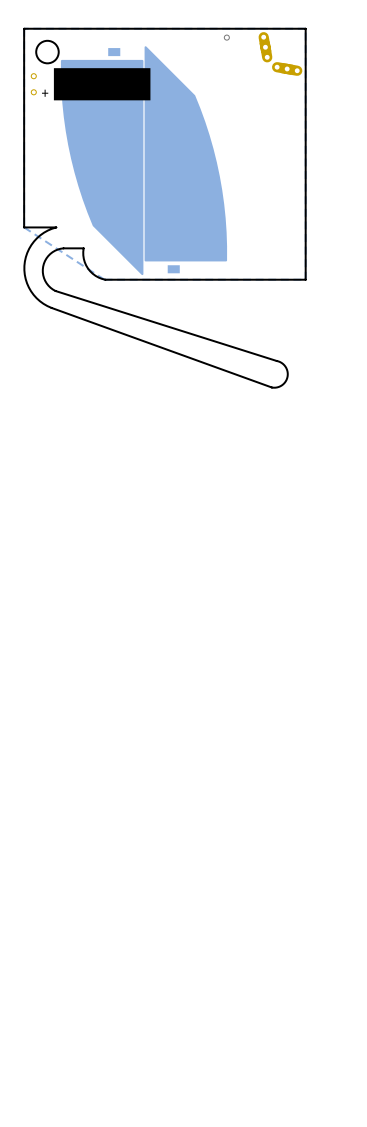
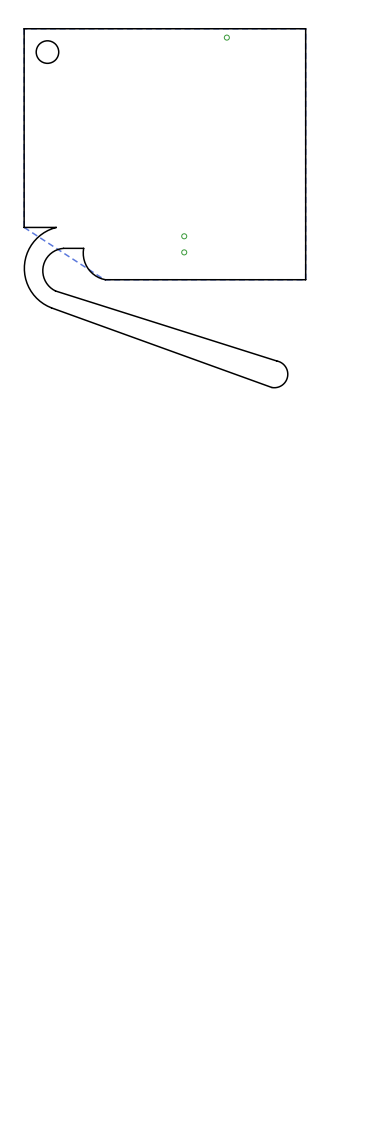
part: (265, 47) -> none
part: (287, 68) -> none
part side: bottom (90, 84) -> top (184, 244)
part: (185, 159) -> none
part: (102, 161) -> none

